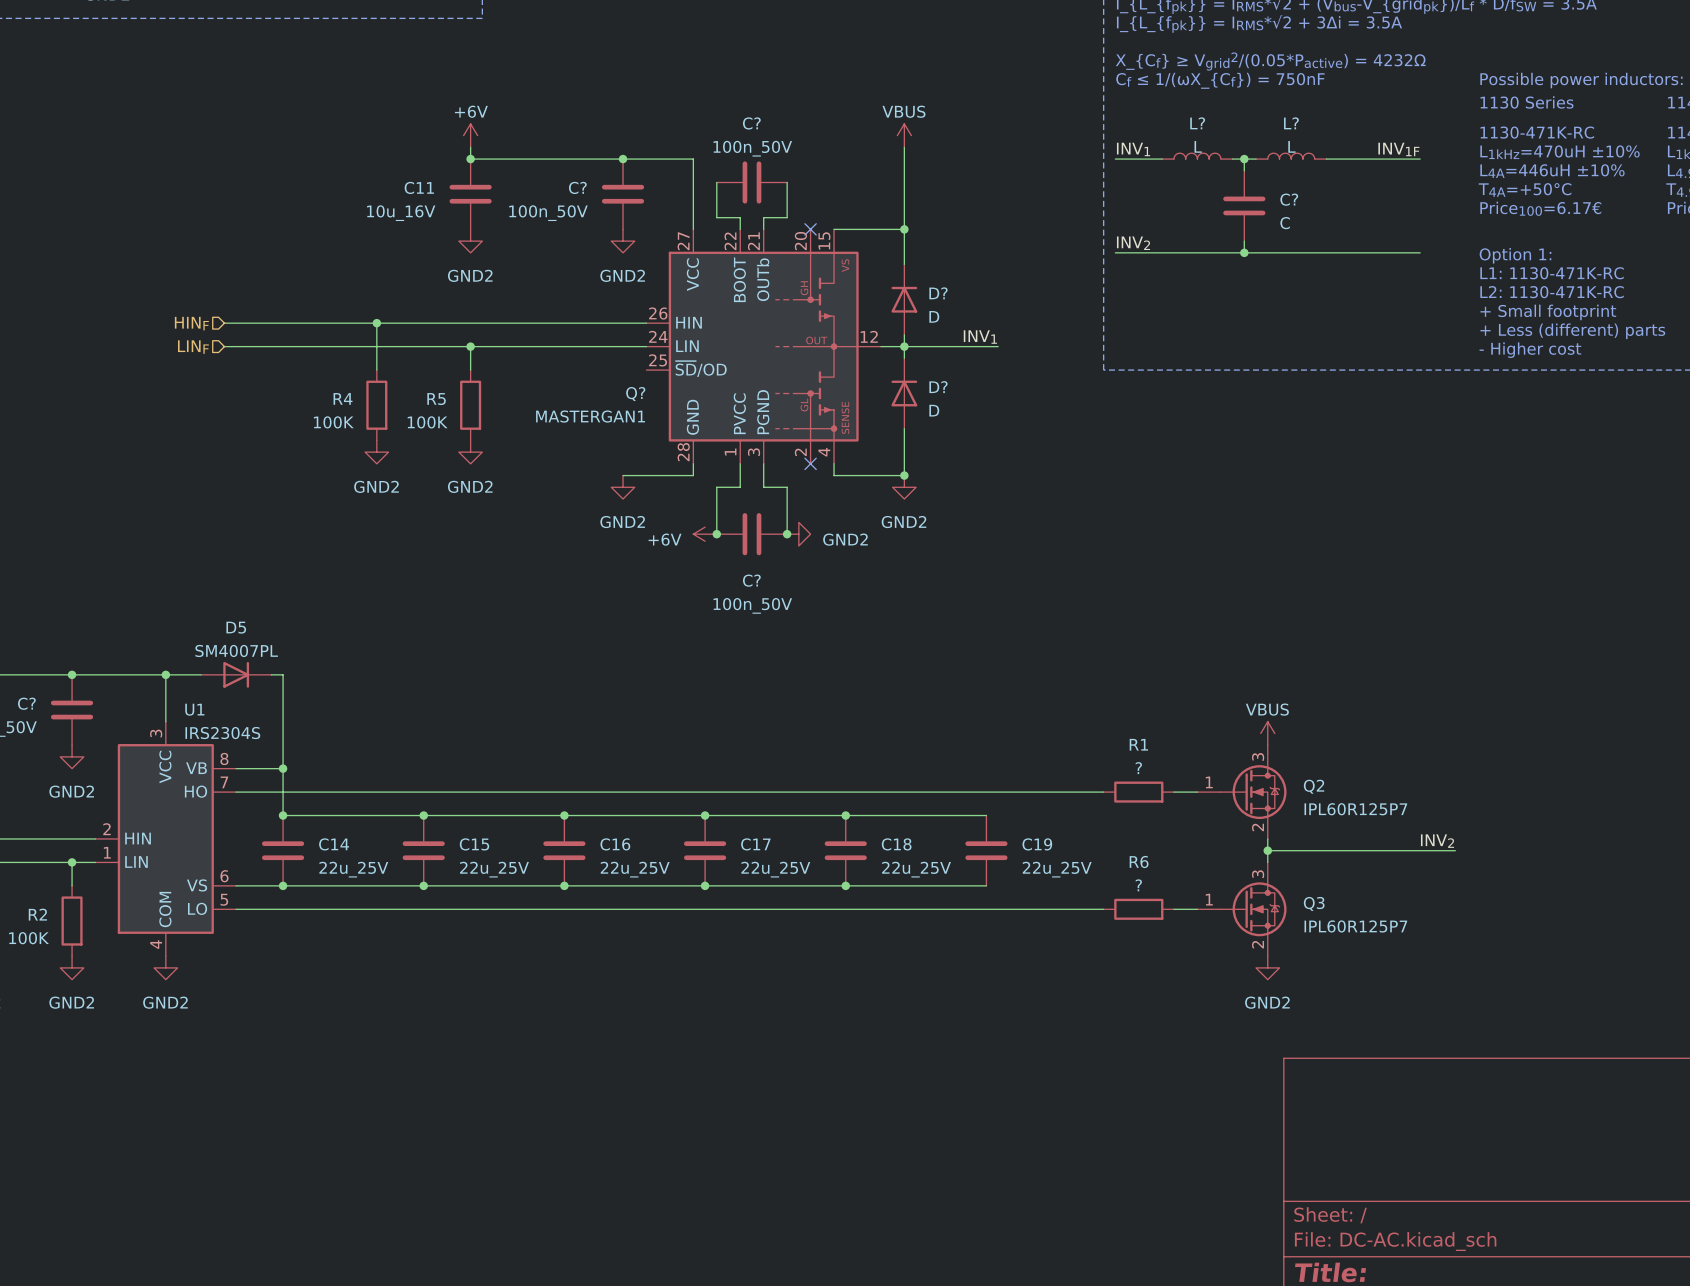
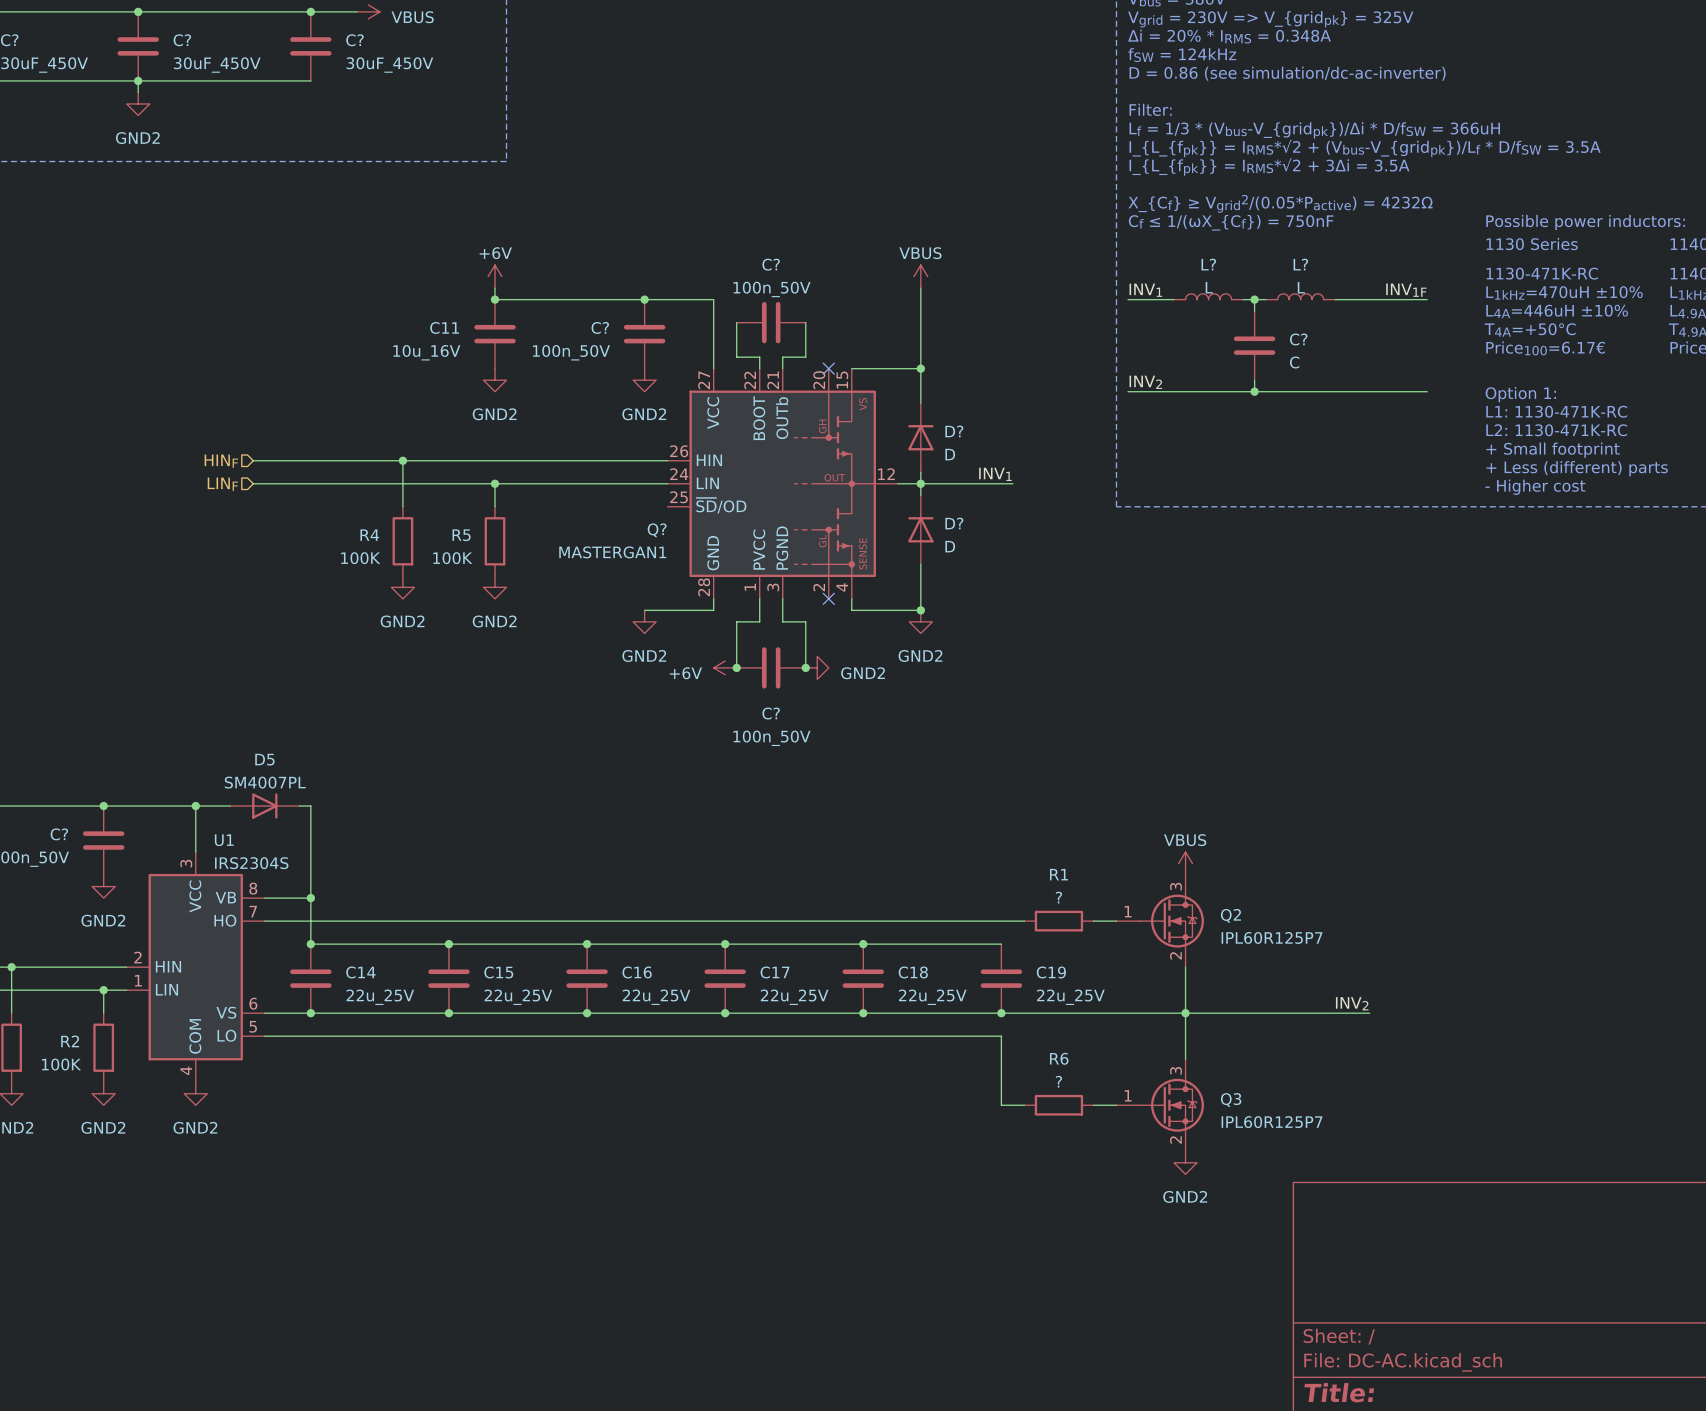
power symbol position: VBUS (1267, 733) -> VBUS (1185, 863)
wire: (1009, 792) (1080, 792) -> none
R1 position: (1138, 792) -> (1058, 921)
wire: (1173, 792) (1197, 792) -> none
Q2 position: (1241, 792) -> (1160, 921)
wire: none -> (1185, 967) (1185, 1059)
wire: (1267, 838) (1267, 862) -> none
label position: INV2 (1437, 841) -> INV2 (1352, 1003)
wire: (1267, 850) (1455, 850) -> none
junction: (1267, 850) -> none
wire: none -> (1001, 1013) (1369, 1013)
junction: none -> (1001, 1013)
junction: none -> (1185, 1013)
wire: (986, 909) (1103, 909) -> (1001, 1036) (1001, 1105) (1024, 1105)
R6 position: (1138, 909) -> (1058, 1105)
wire: (1173, 909) (1197, 909) -> (1093, 1105) (1116, 1105)
Q3 position: (1241, 909) -> (1160, 1105)
power symbol position: GND2 (1267, 967) -> GND2 (1185, 1162)

